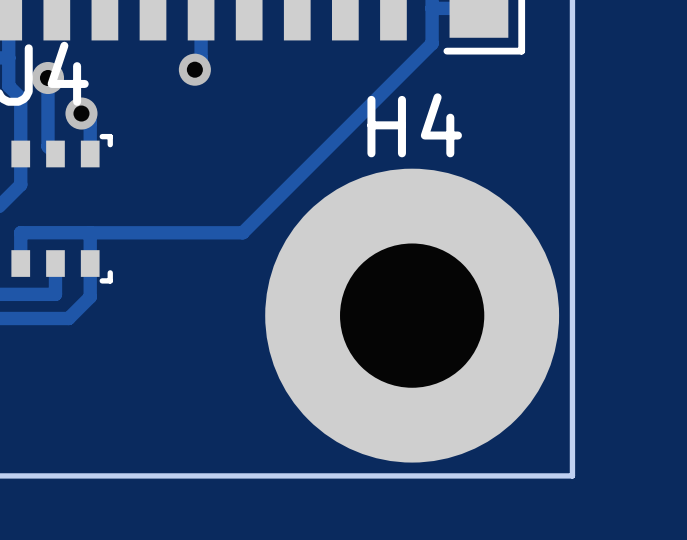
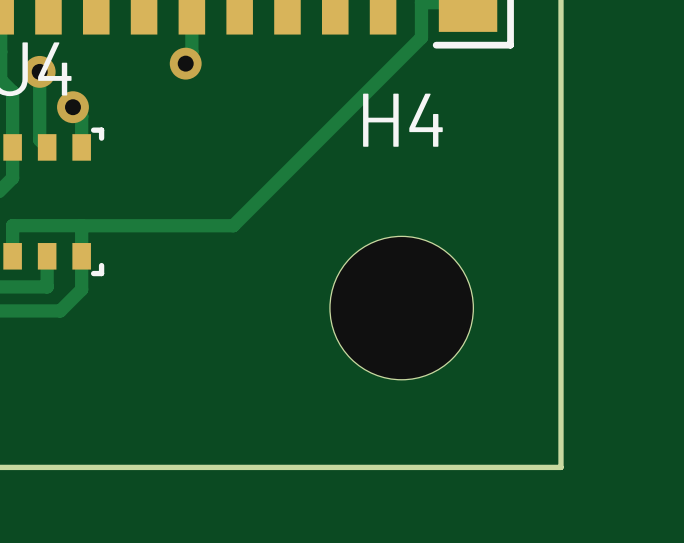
H4 footprint: [265, 168, 560, 463] -> [329, 236, 474, 380]

